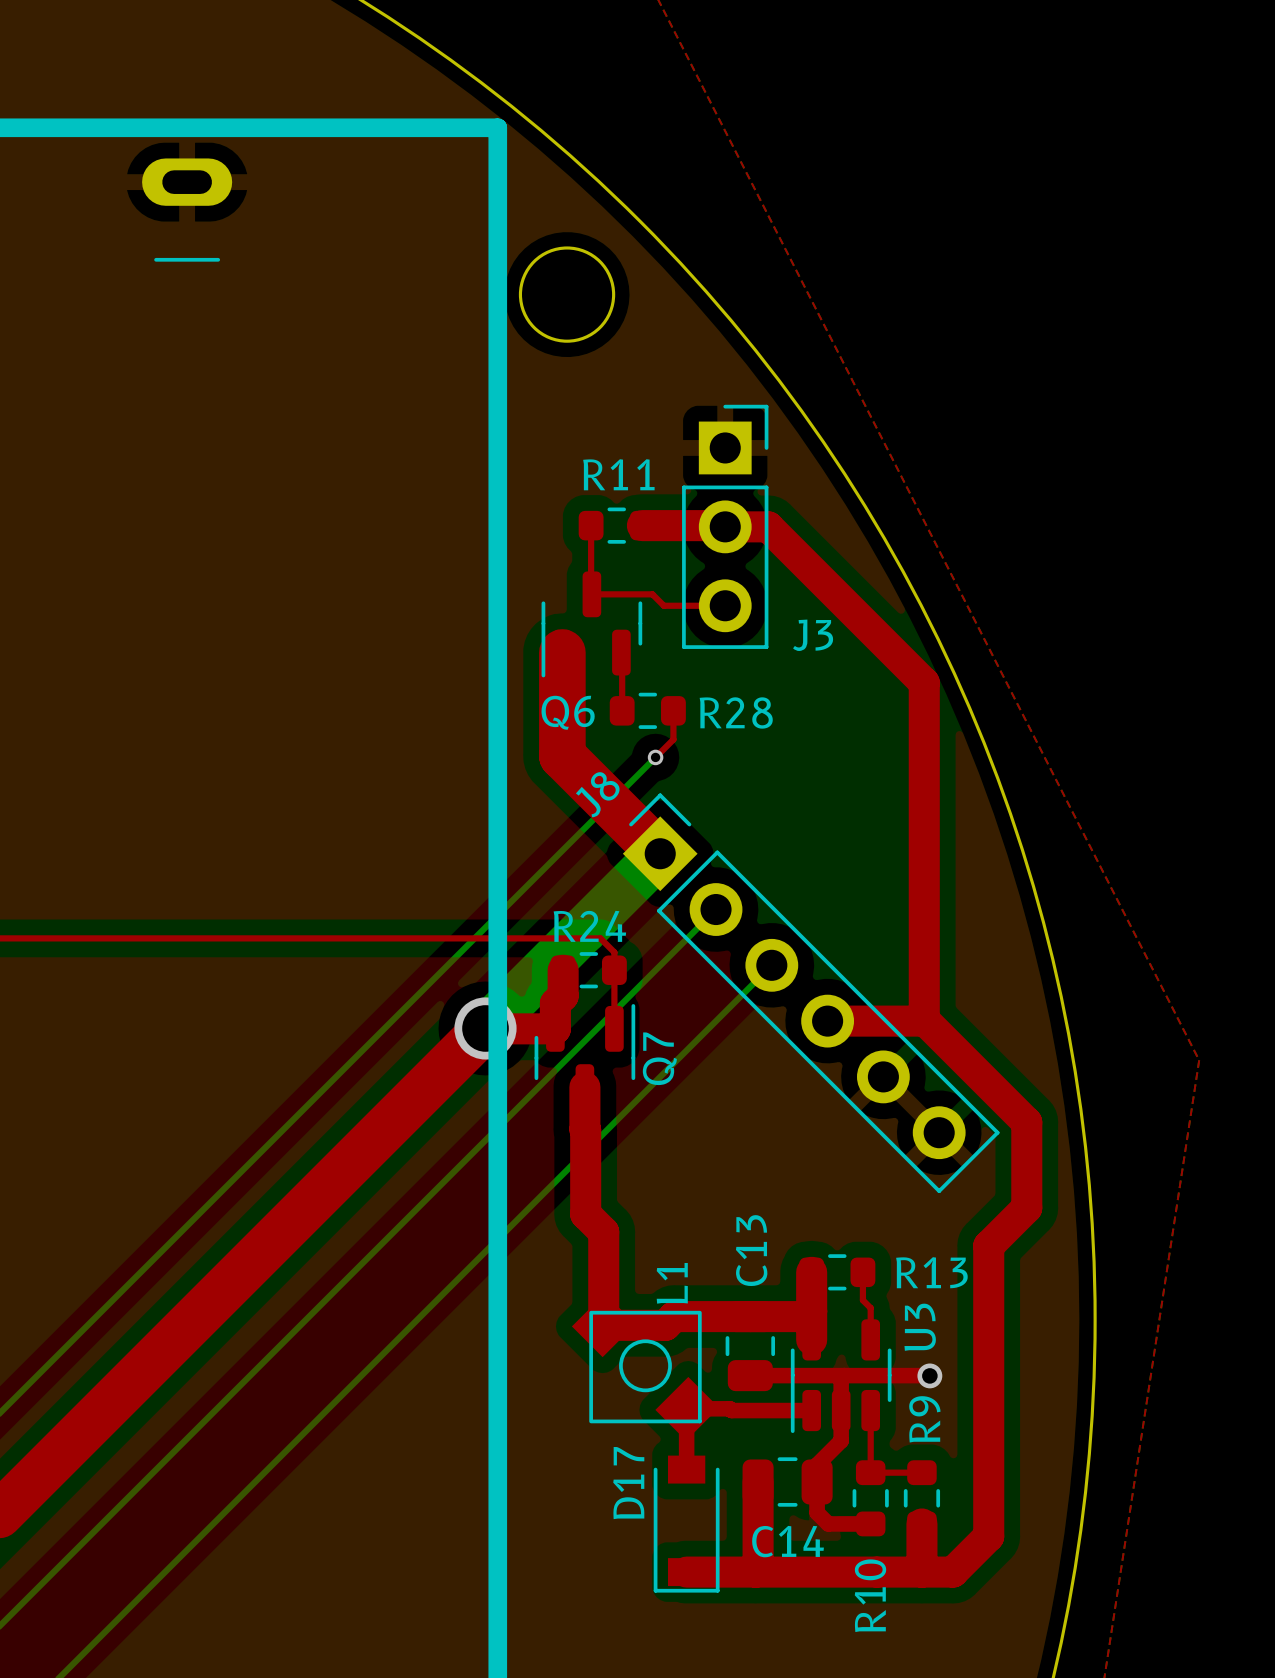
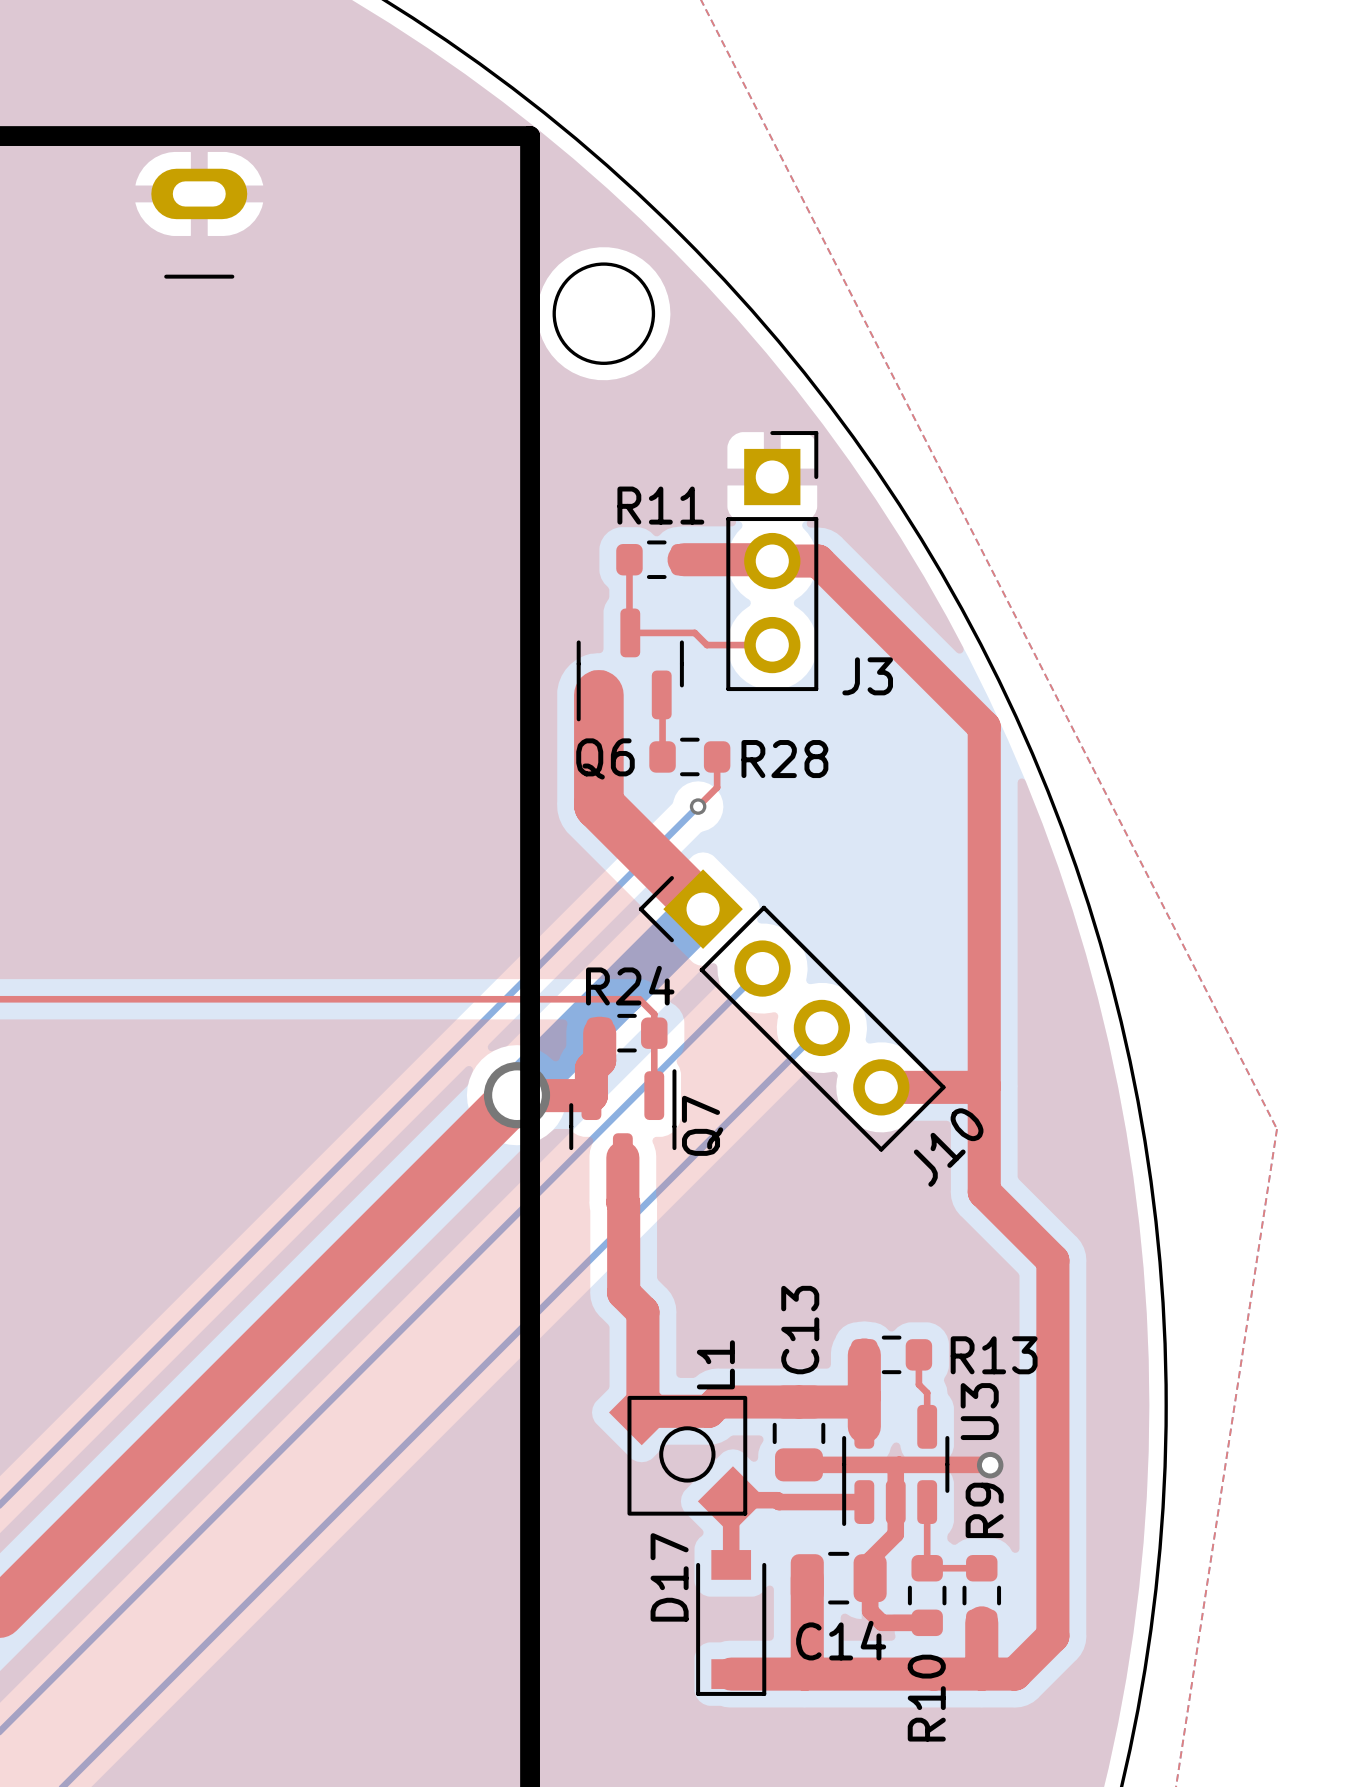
J10: none -> (792, 1010)
J8: (811, 993) -> none
top track: (924, 1019) (1026, 1122) (1026, 1207) (988, 1245) -> (984, 1086) (984, 1191) (1052, 1260) (1052, 1326)

